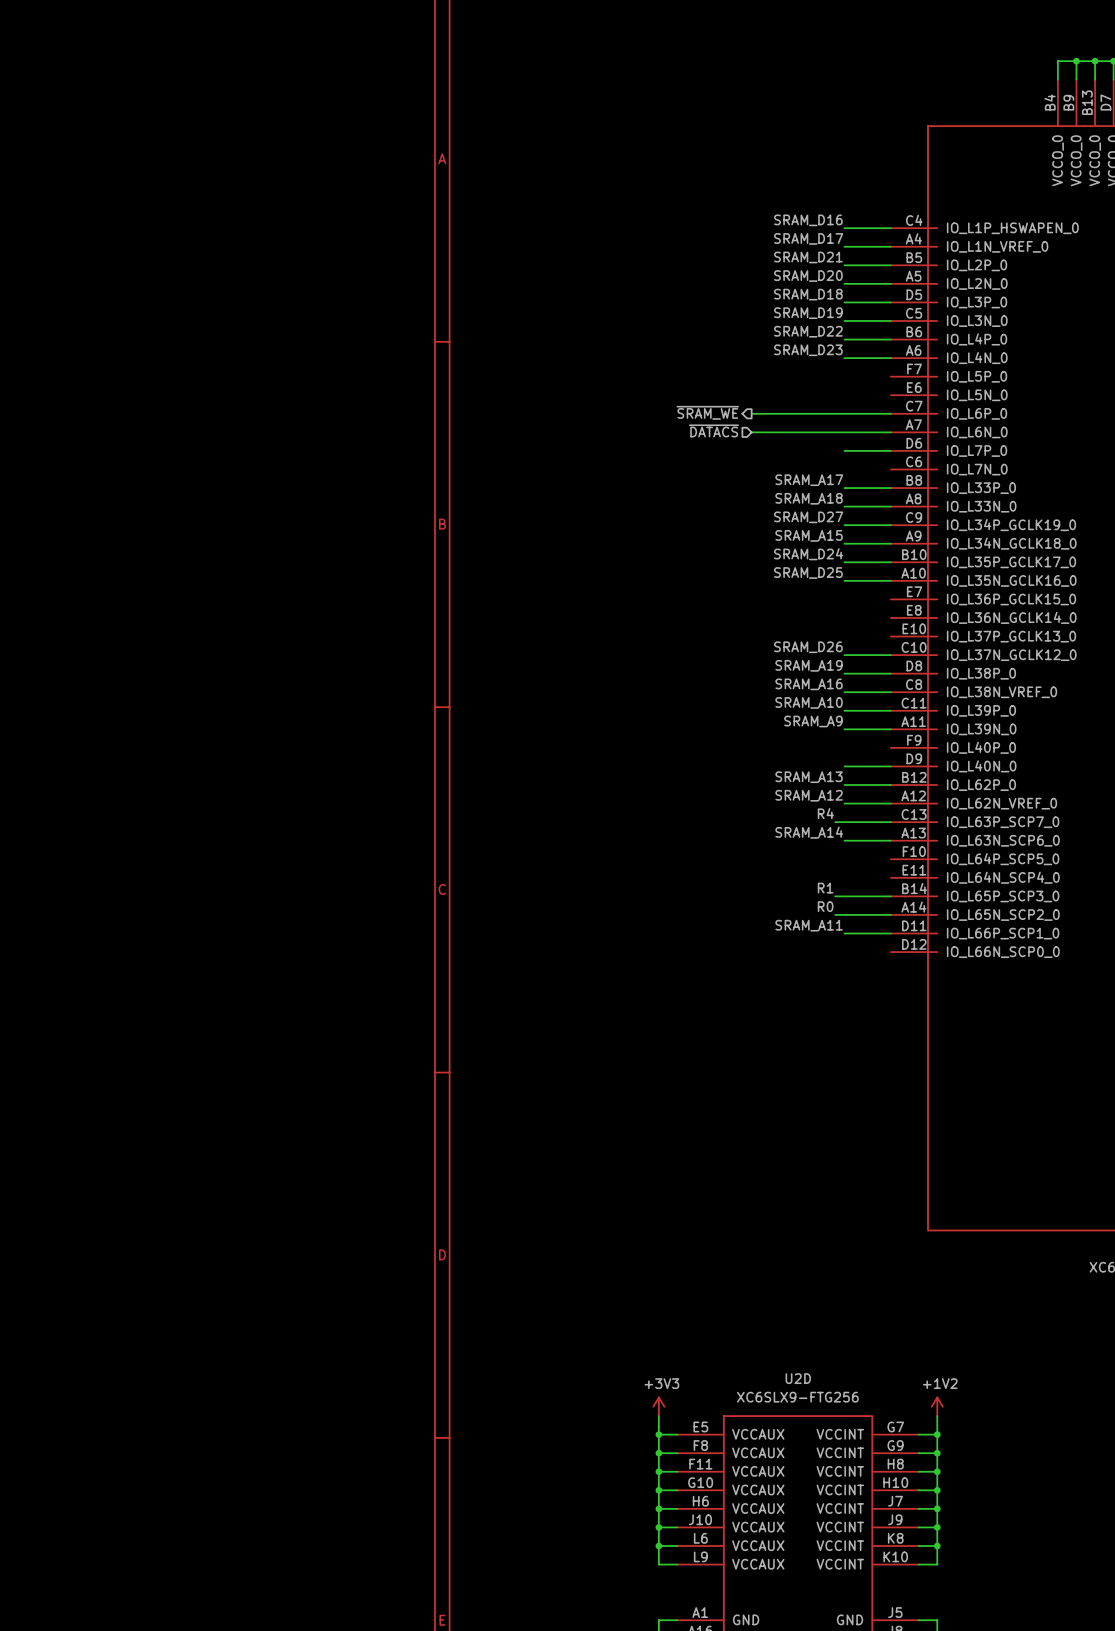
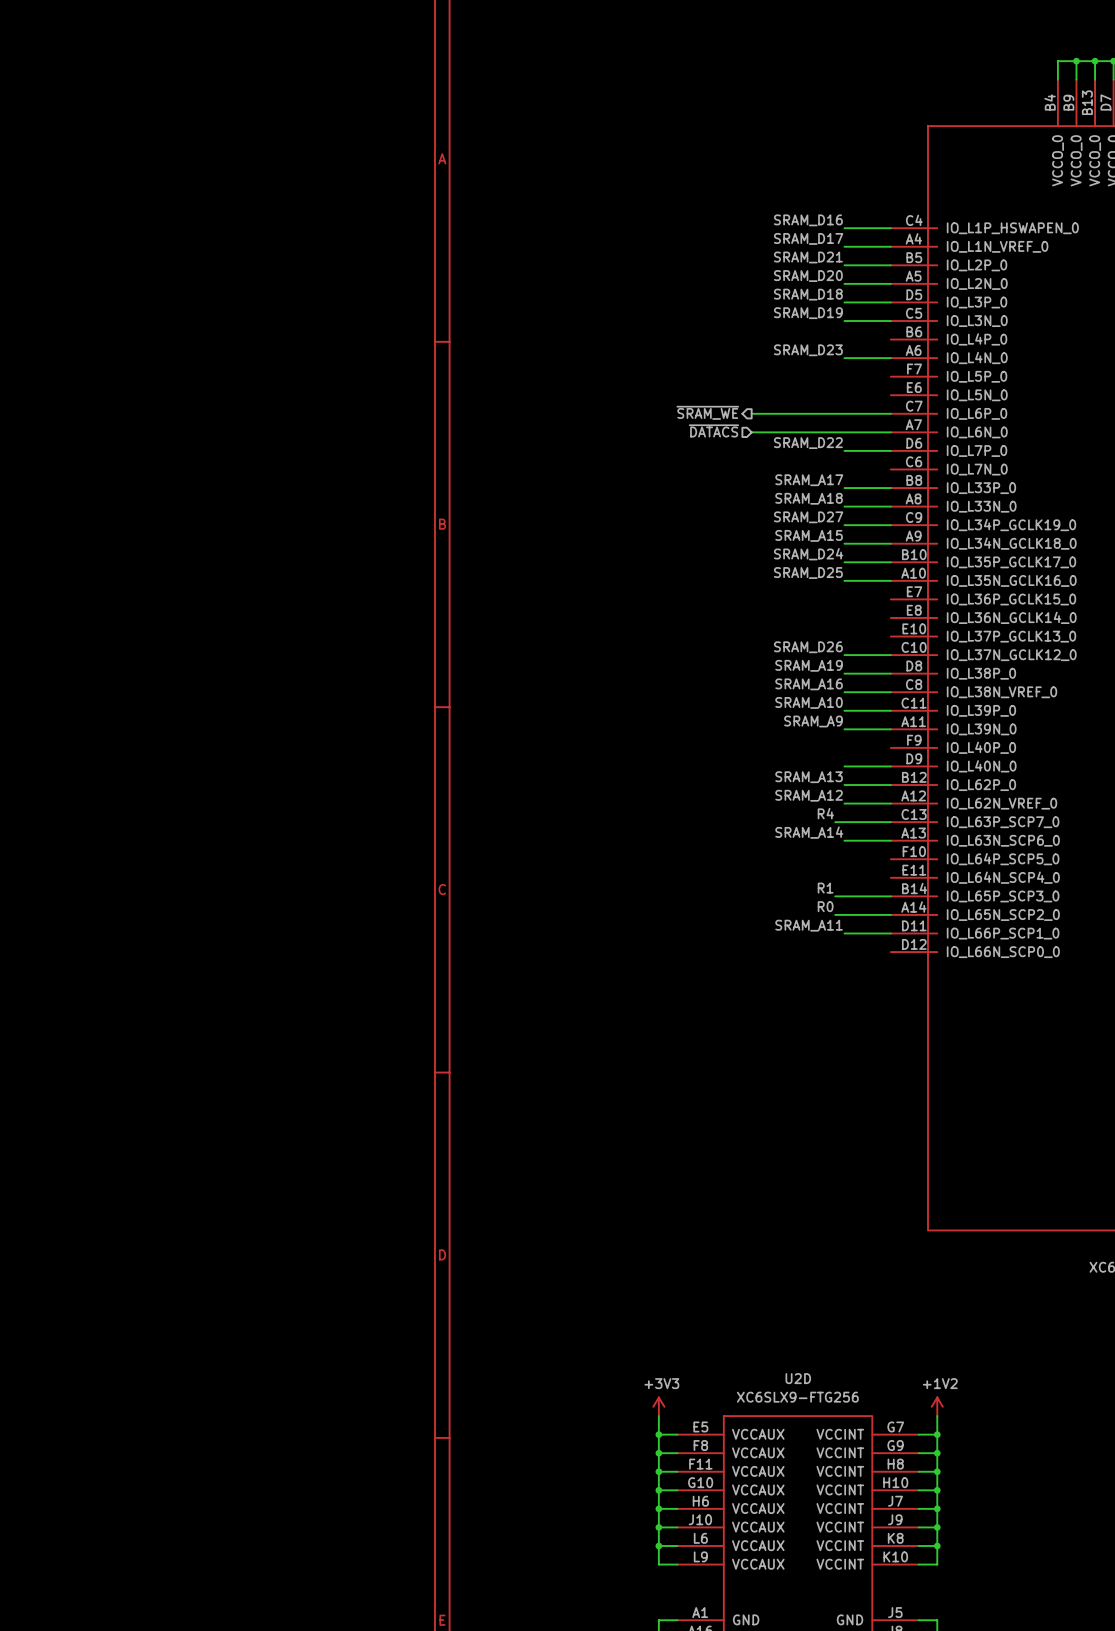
label position: SRAM_D22 (808, 331) -> SRAM_D22 (808, 443)
wire: (844, 339) (890, 339) -> none

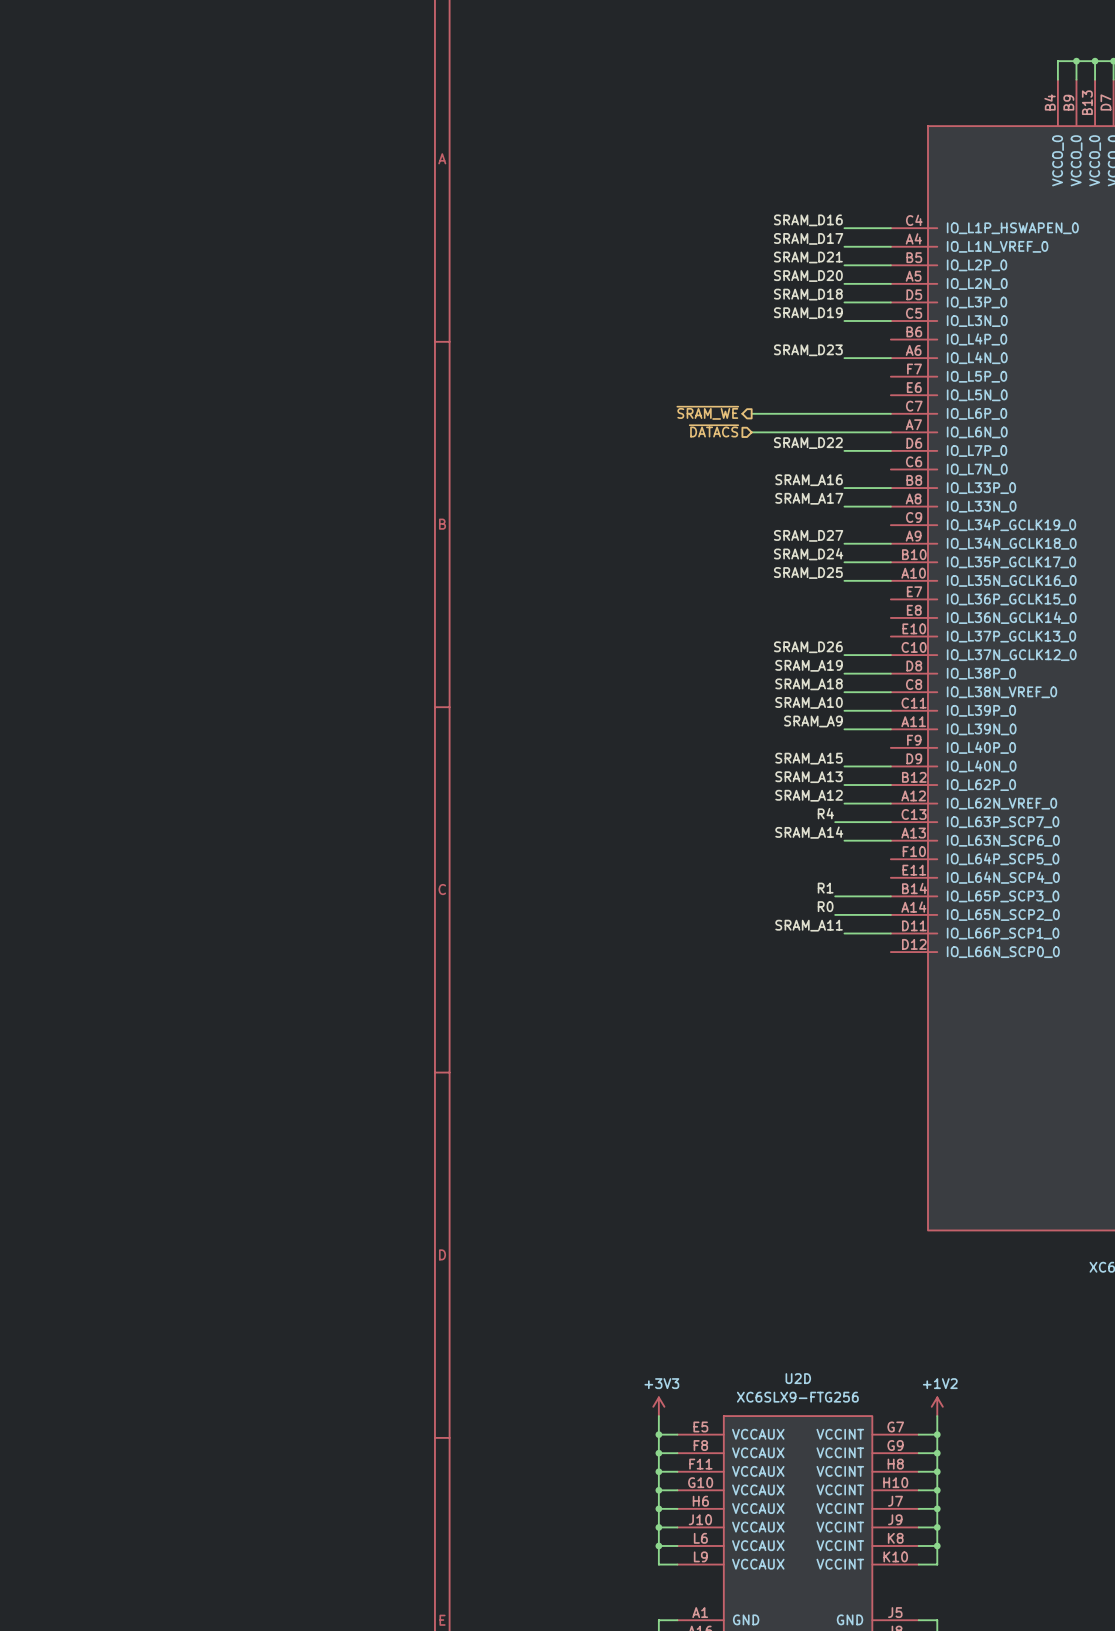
label: SRAM_A17 (809, 480) -> SRAM_A16 (809, 480)
label: SRAM_A18 (809, 498) -> SRAM_A17 (809, 498)
label: SRAM_D27 (808, 517) -> none
wire: (844, 525) (890, 525) -> none
label: SRAM_A15 (809, 535) -> SRAM_D27 (808, 535)
label: SRAM_A16 (809, 684) -> SRAM_A18 (809, 684)
label: none -> SRAM_A15 (809, 758)

